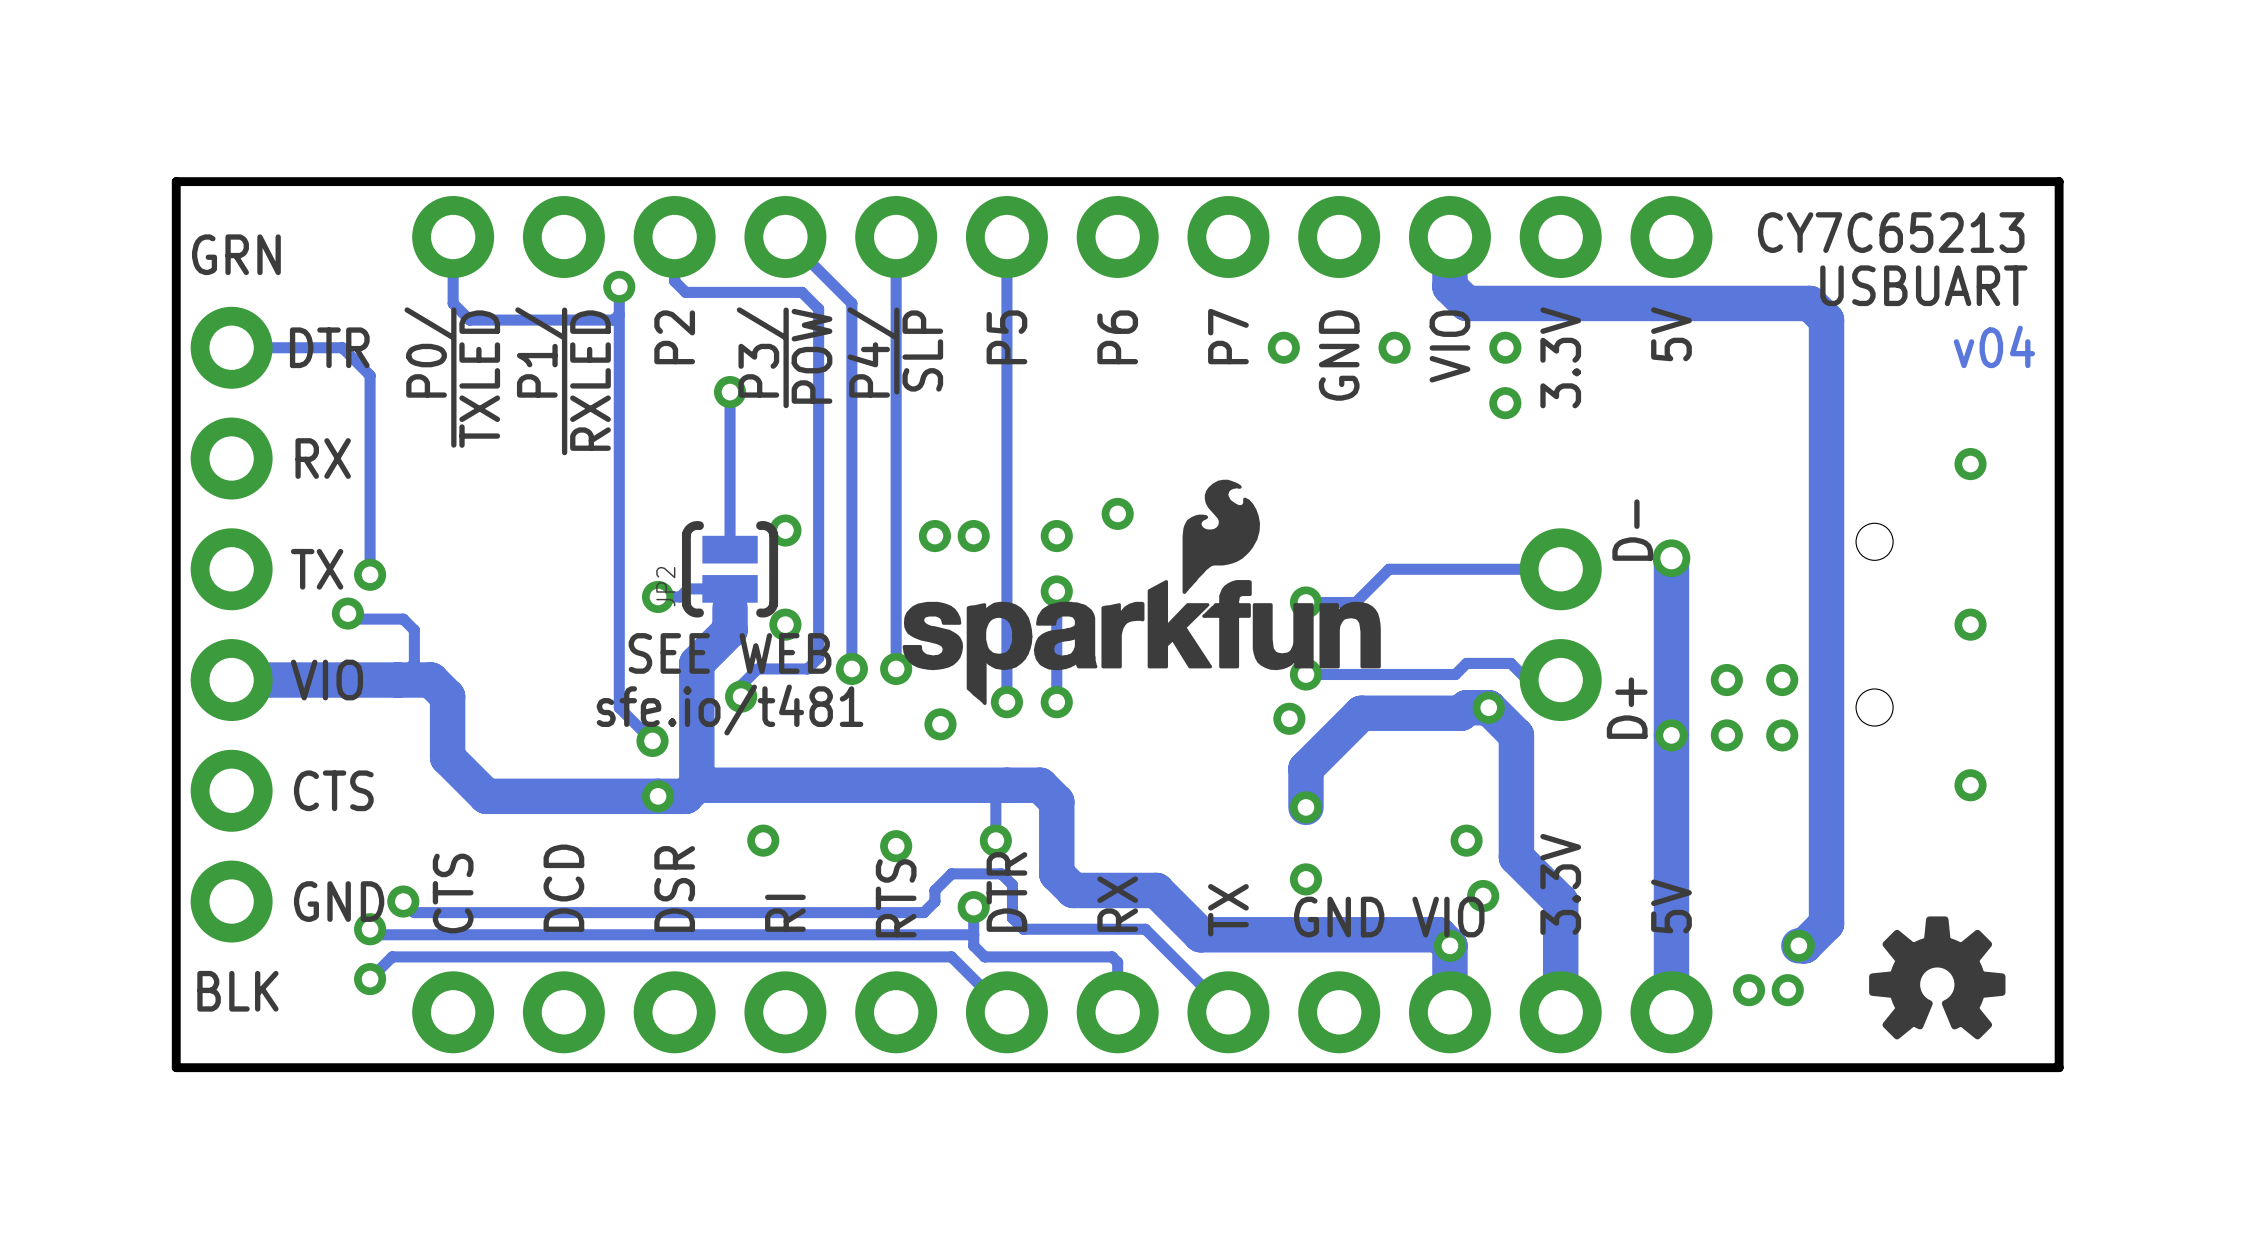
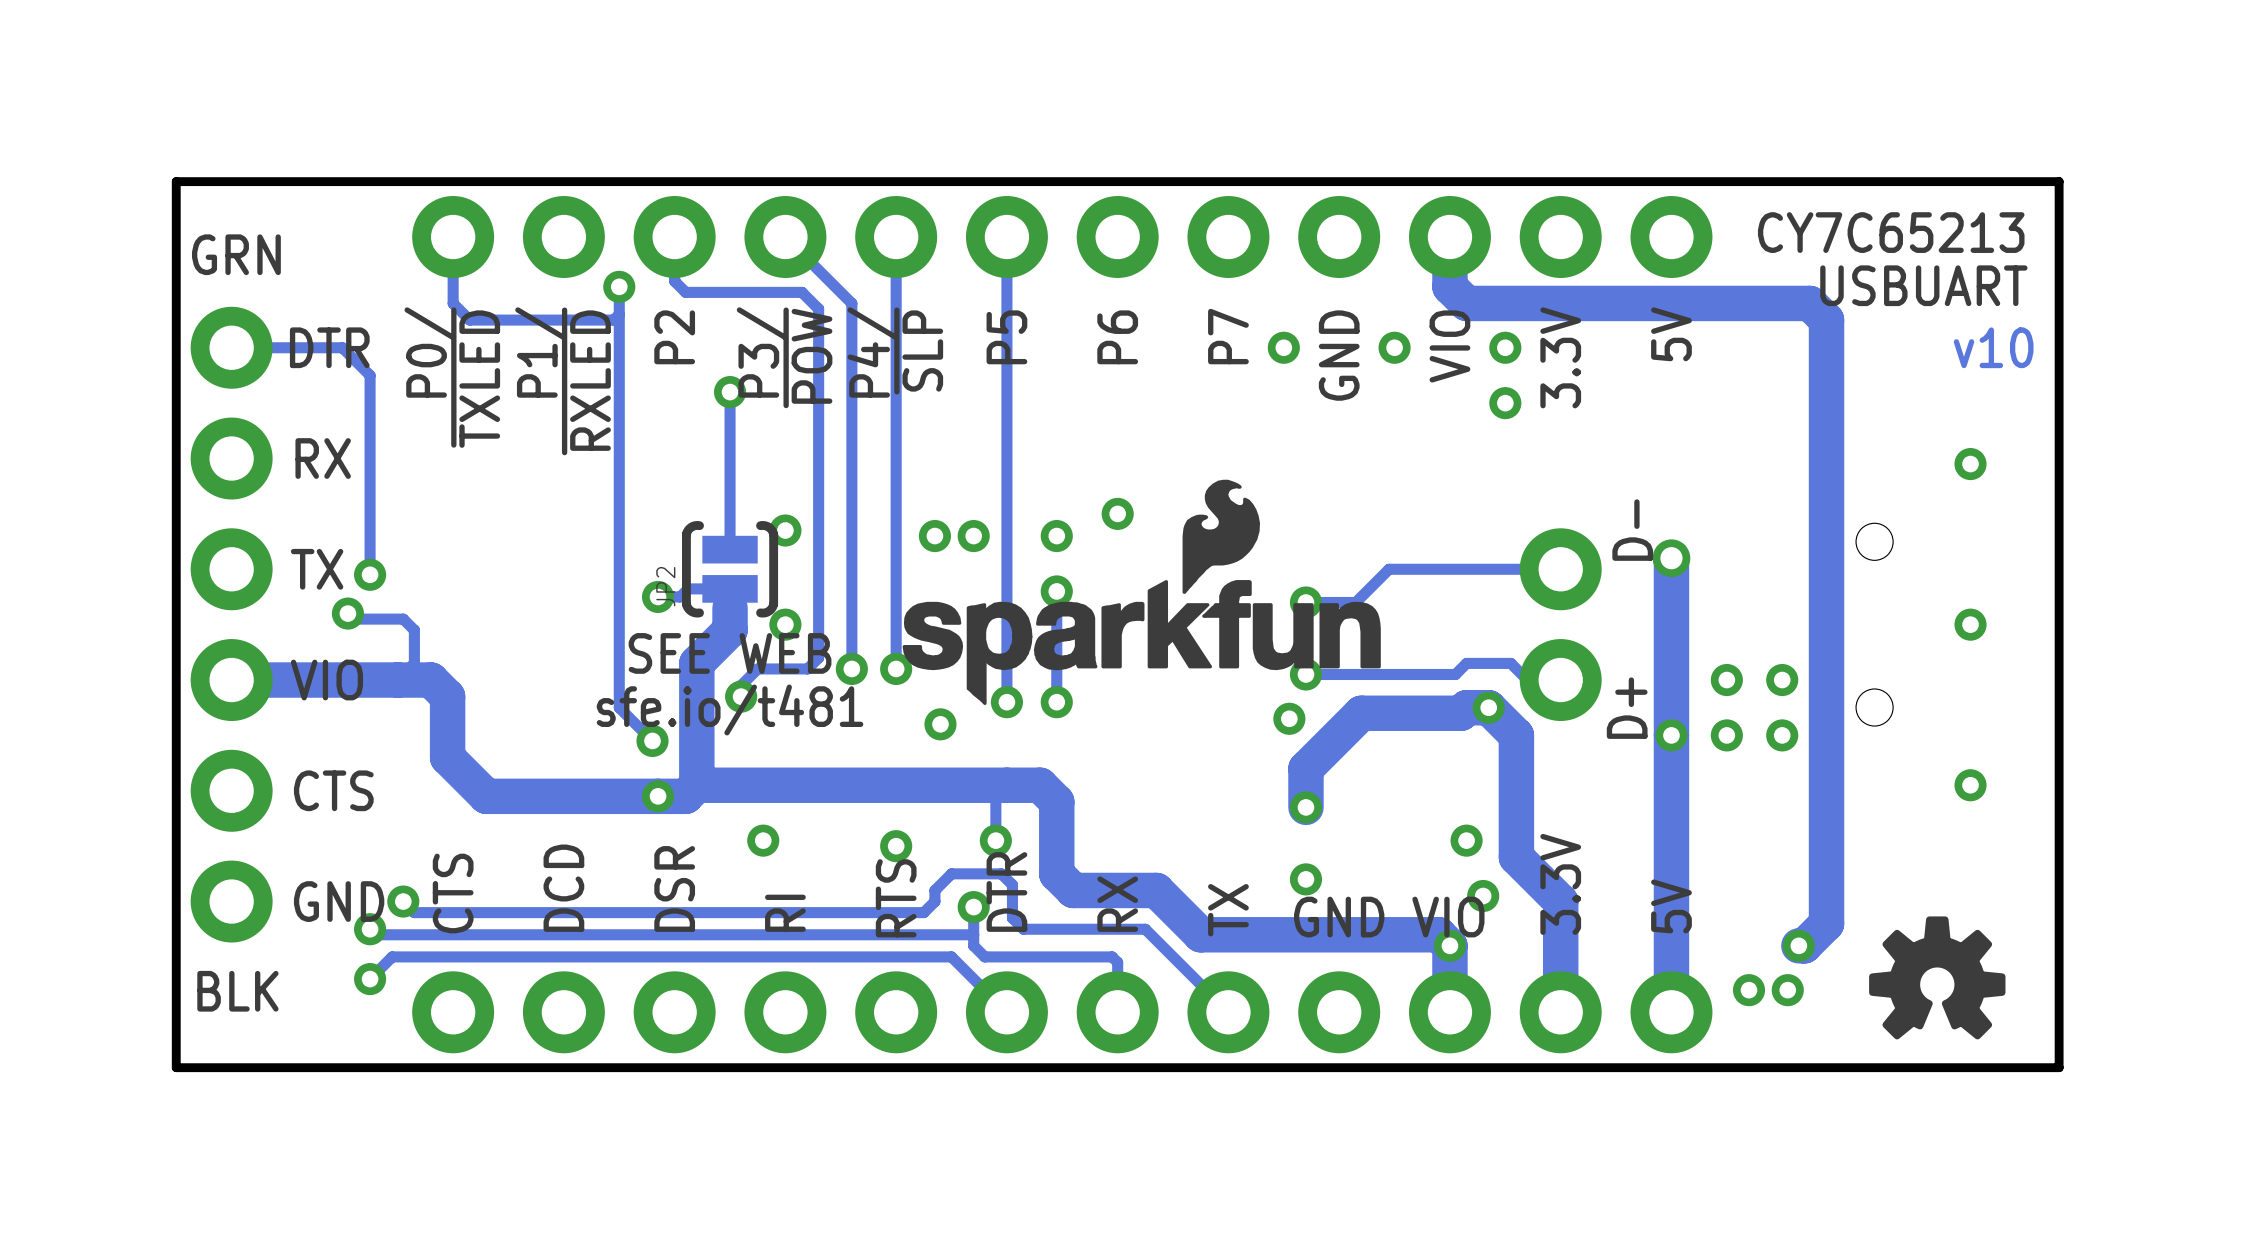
text: v04 (1994, 346) -> v10 (1993, 347)

